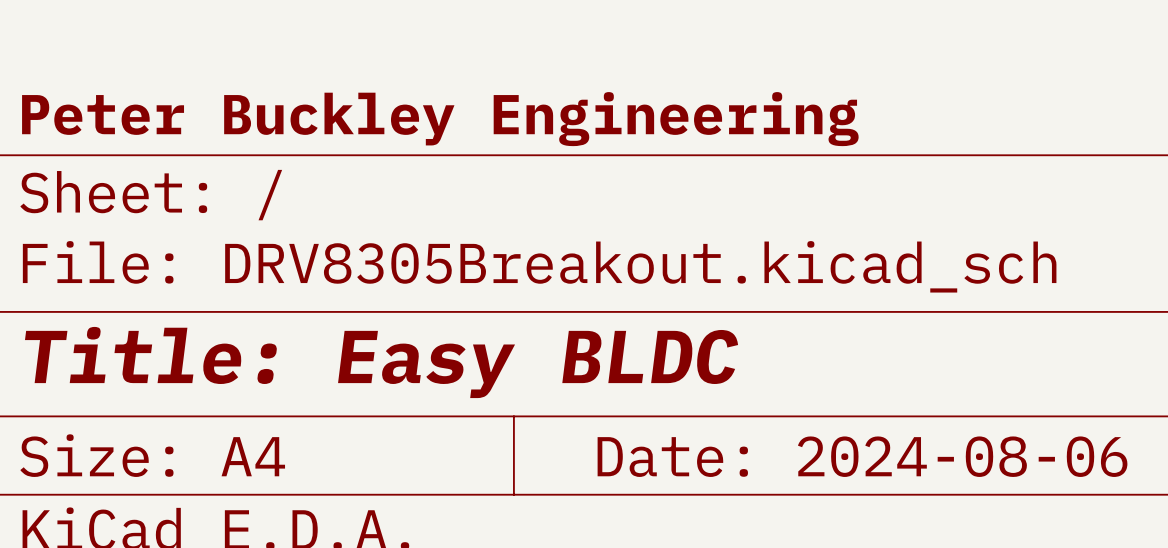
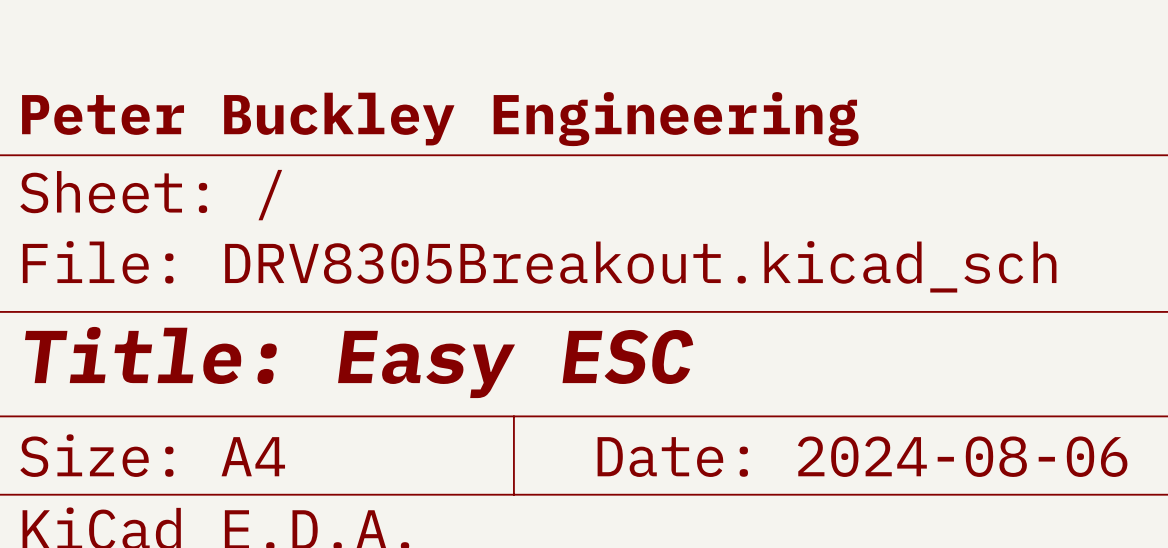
title block: Title: Easy BLDC (381, 362) -> Title: Easy ESC (359, 362)

